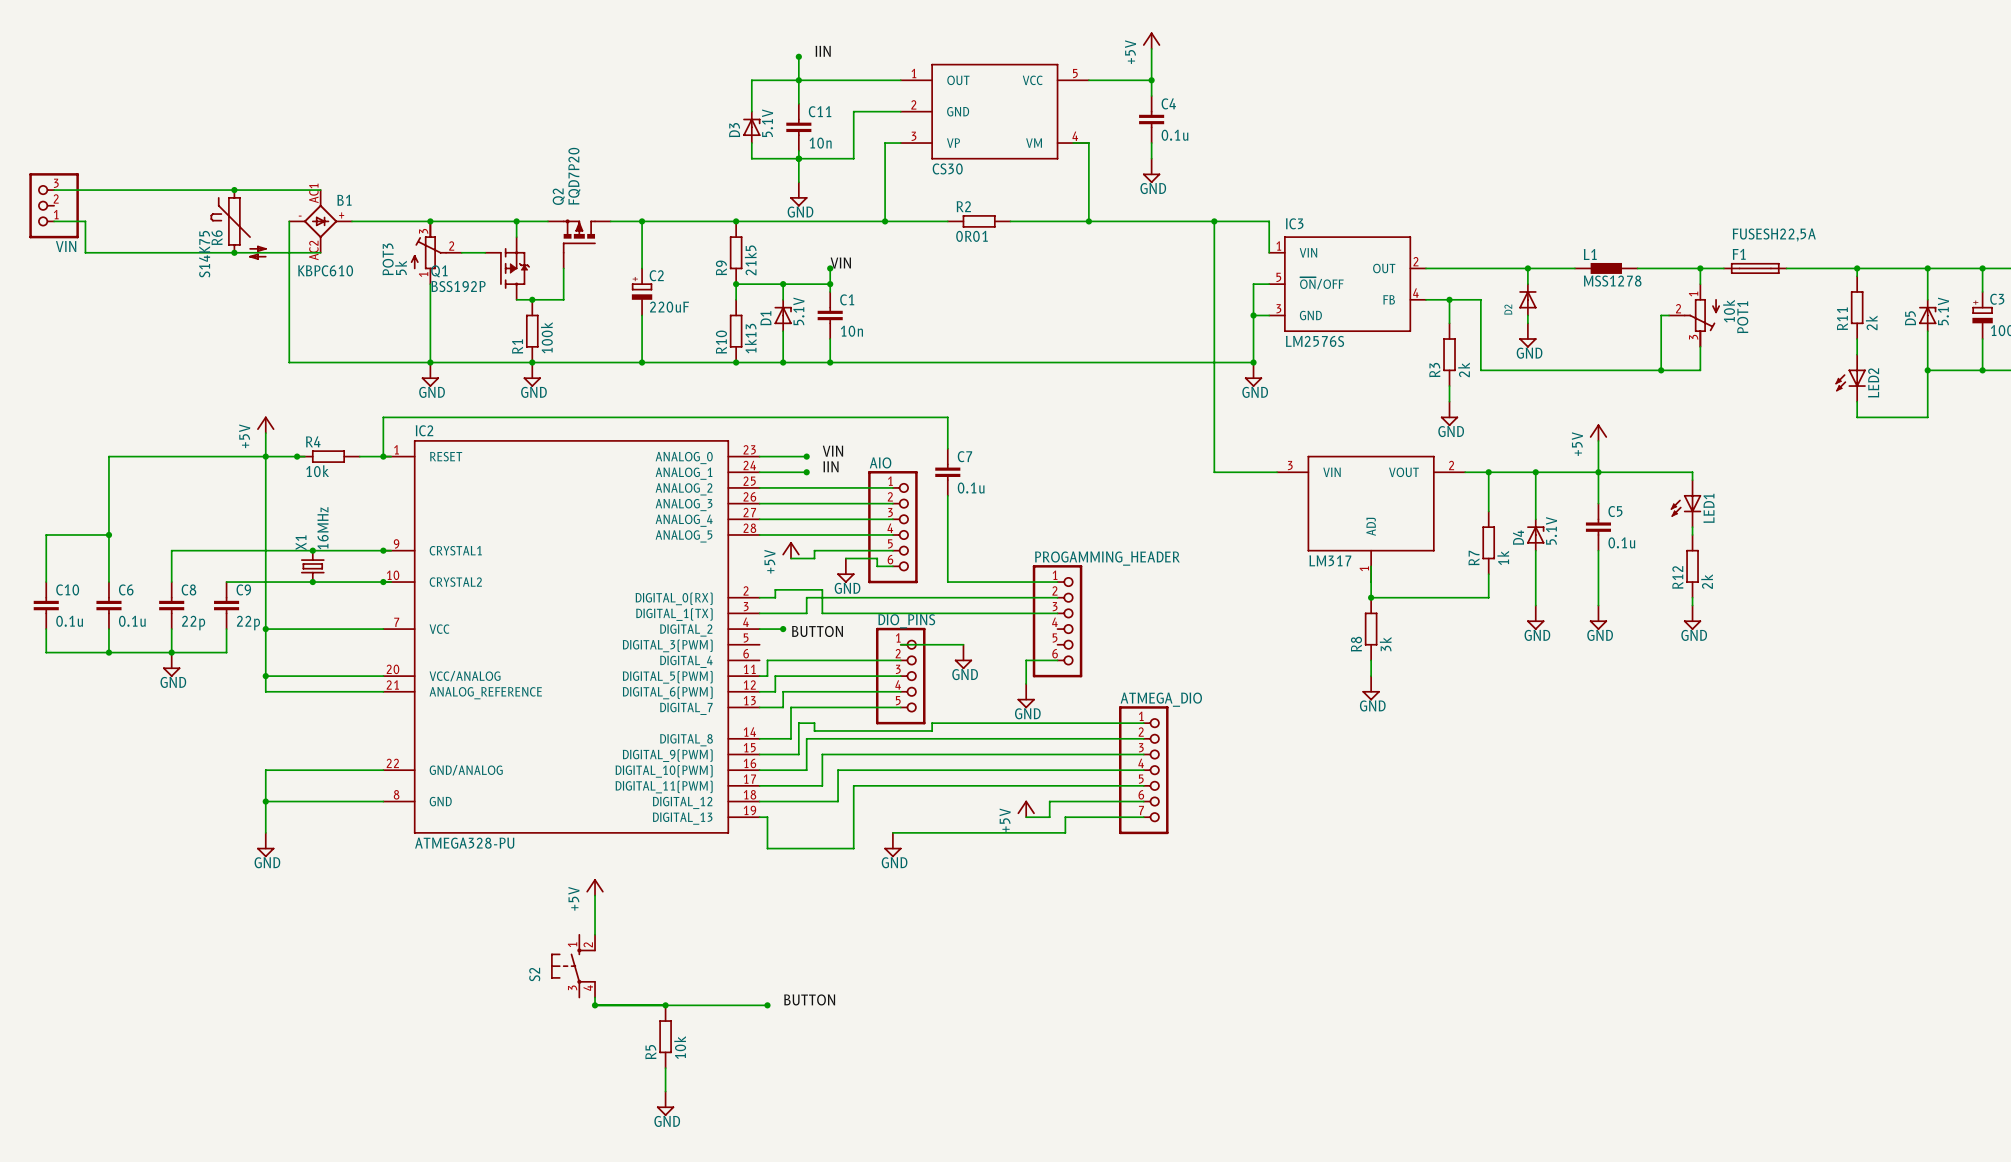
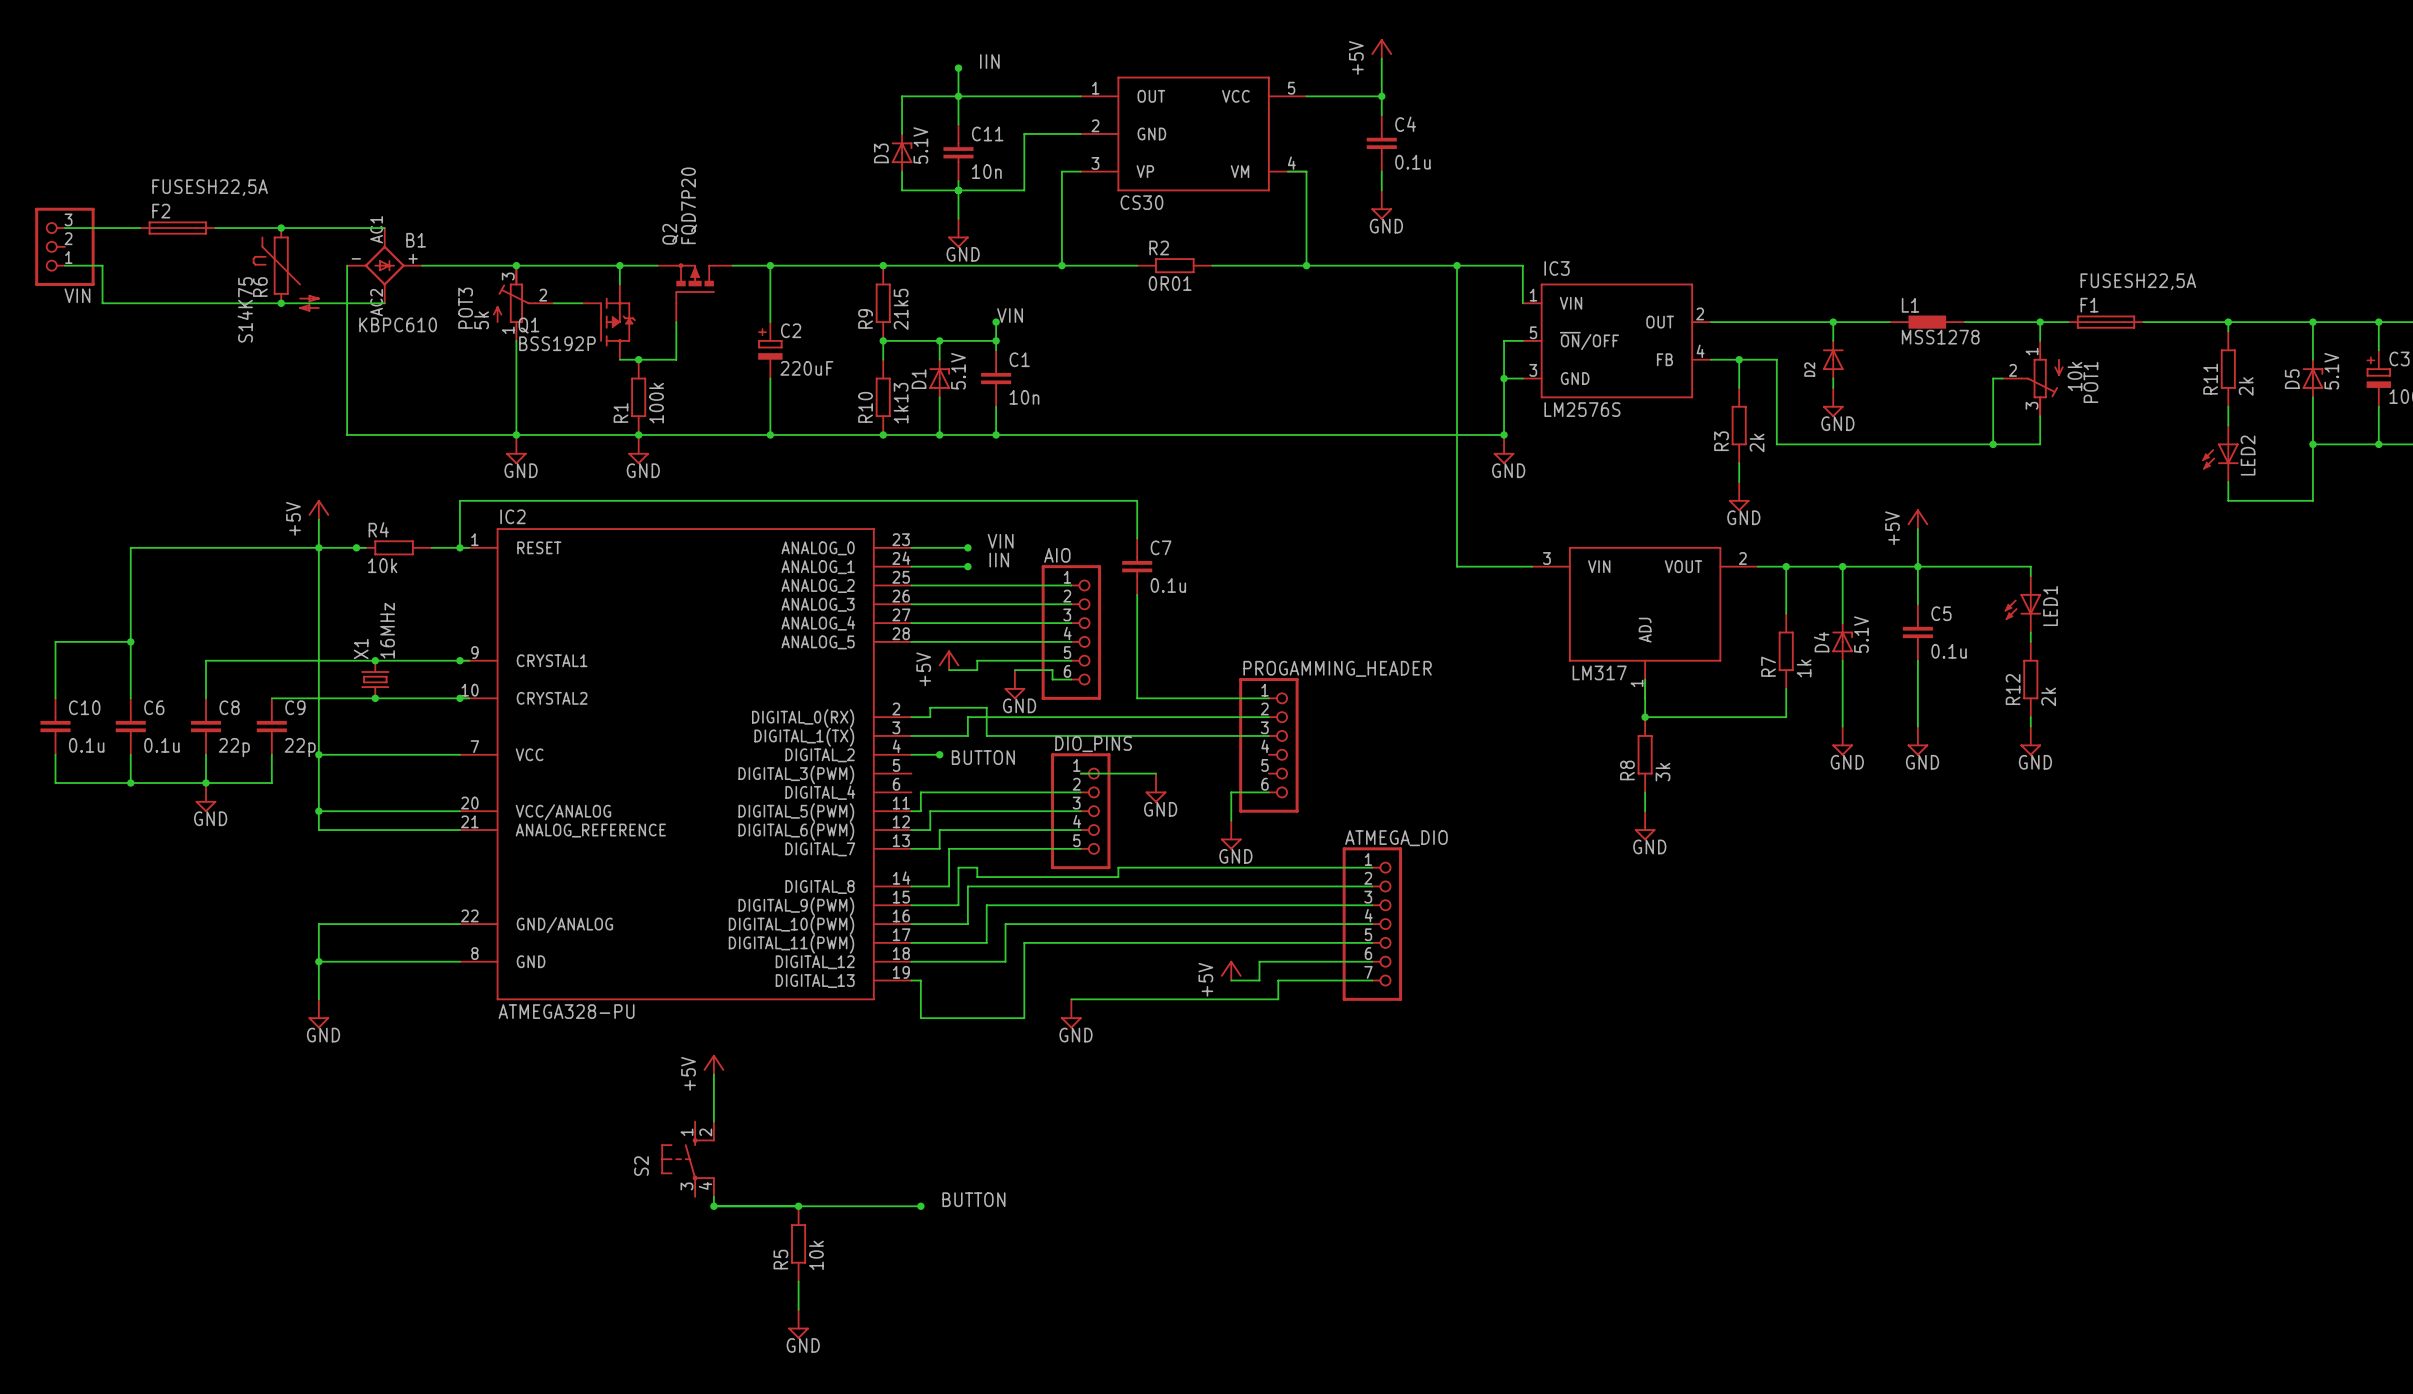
F2: none -> FUSESH22,5A (177, 228)

